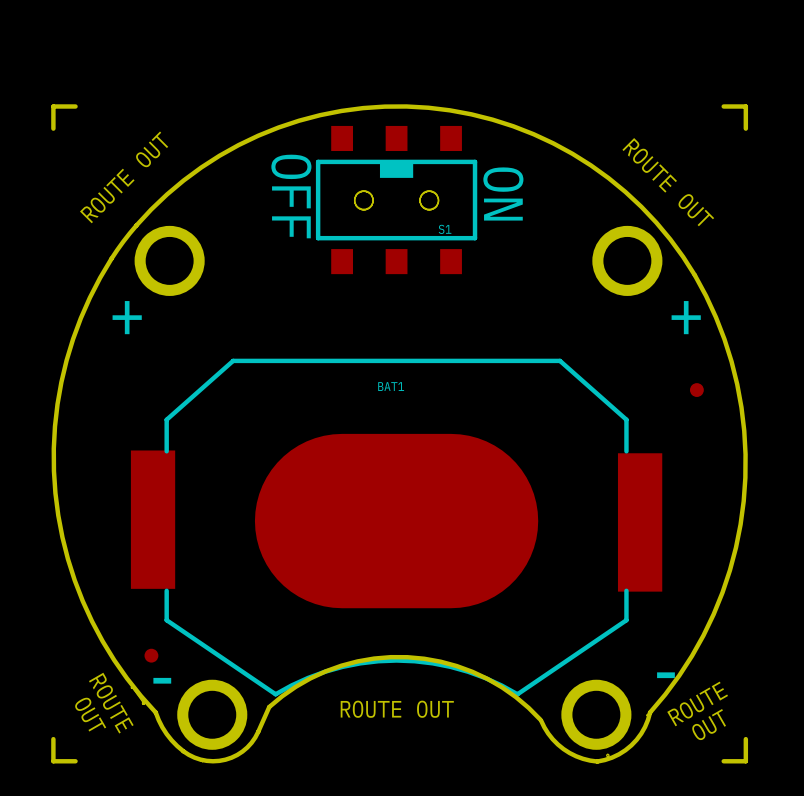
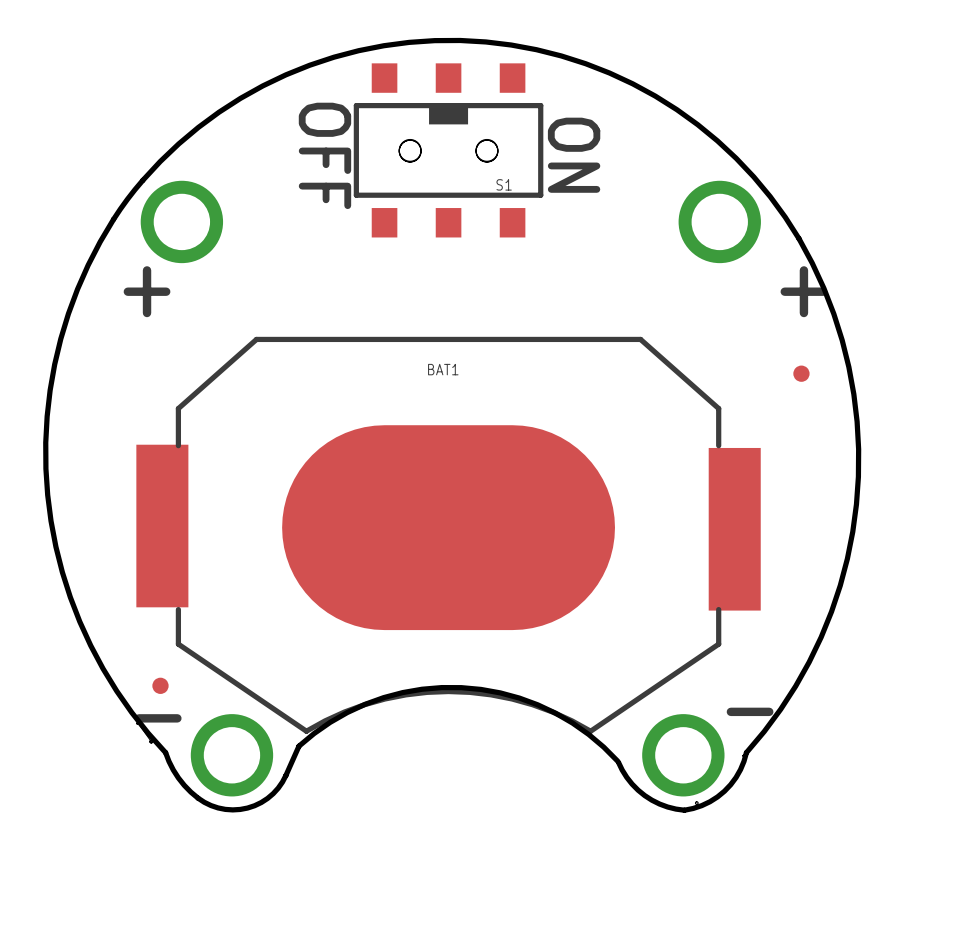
board edge: (75, 106) (53, 106) (53, 128) -> none
board edge: (723, 106) (745, 106) (745, 128) -> none
text: ROUTE OUT (124, 177) -> none
text: ROUTE OUT (668, 182) -> none
text: ROUTE (111, 703) -> none
text: ROUTE (697, 703) -> none
text: ROUTE OUT (397, 709) -> none
text: OUT (90, 714) -> none
text: OUT (709, 724) -> none
board edge: (53, 739) (53, 761) (75, 761) -> none
board edge: (745, 739) (745, 761) (723, 761) -> none

